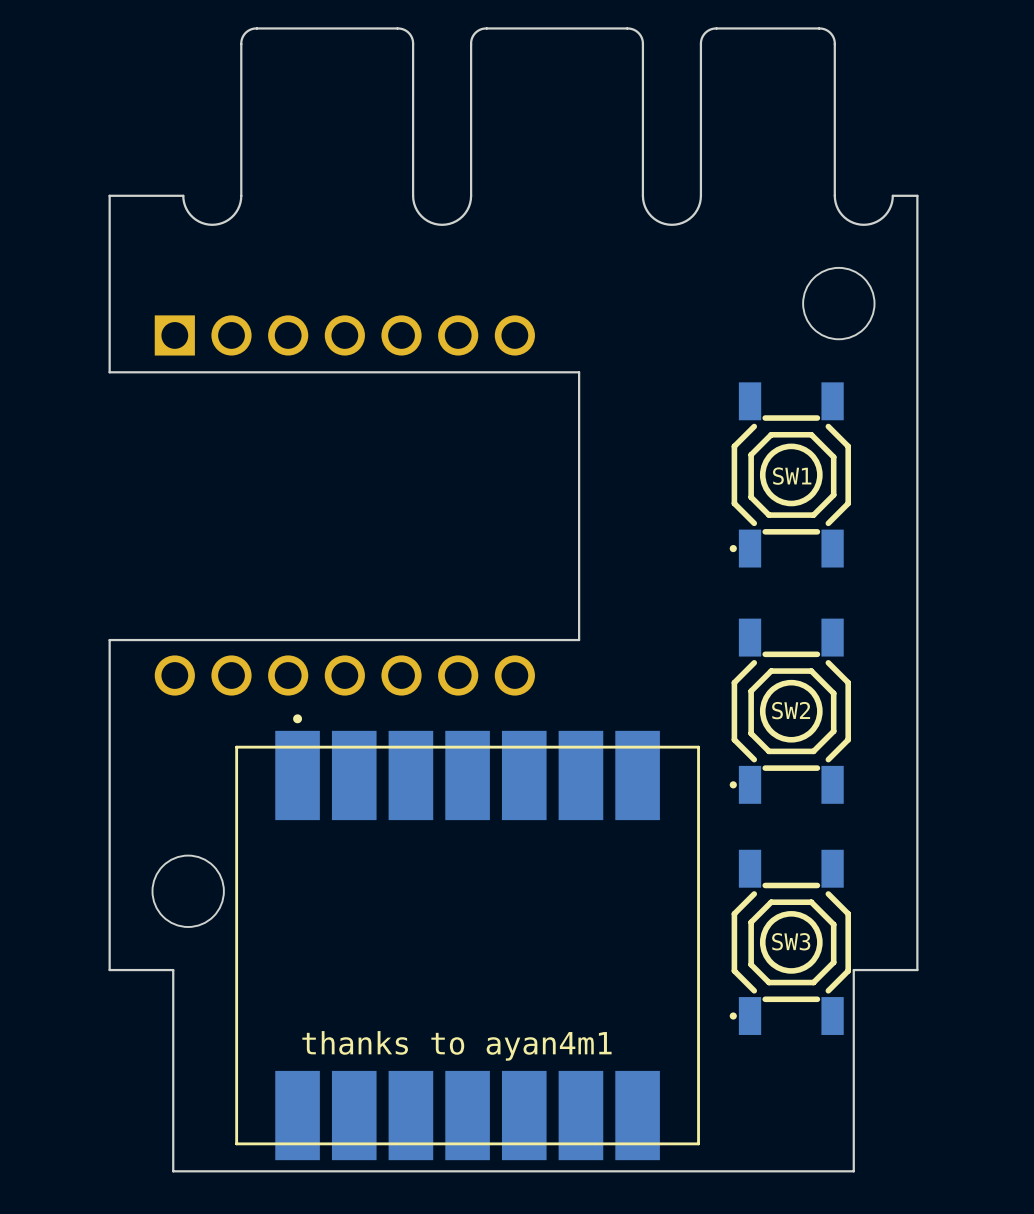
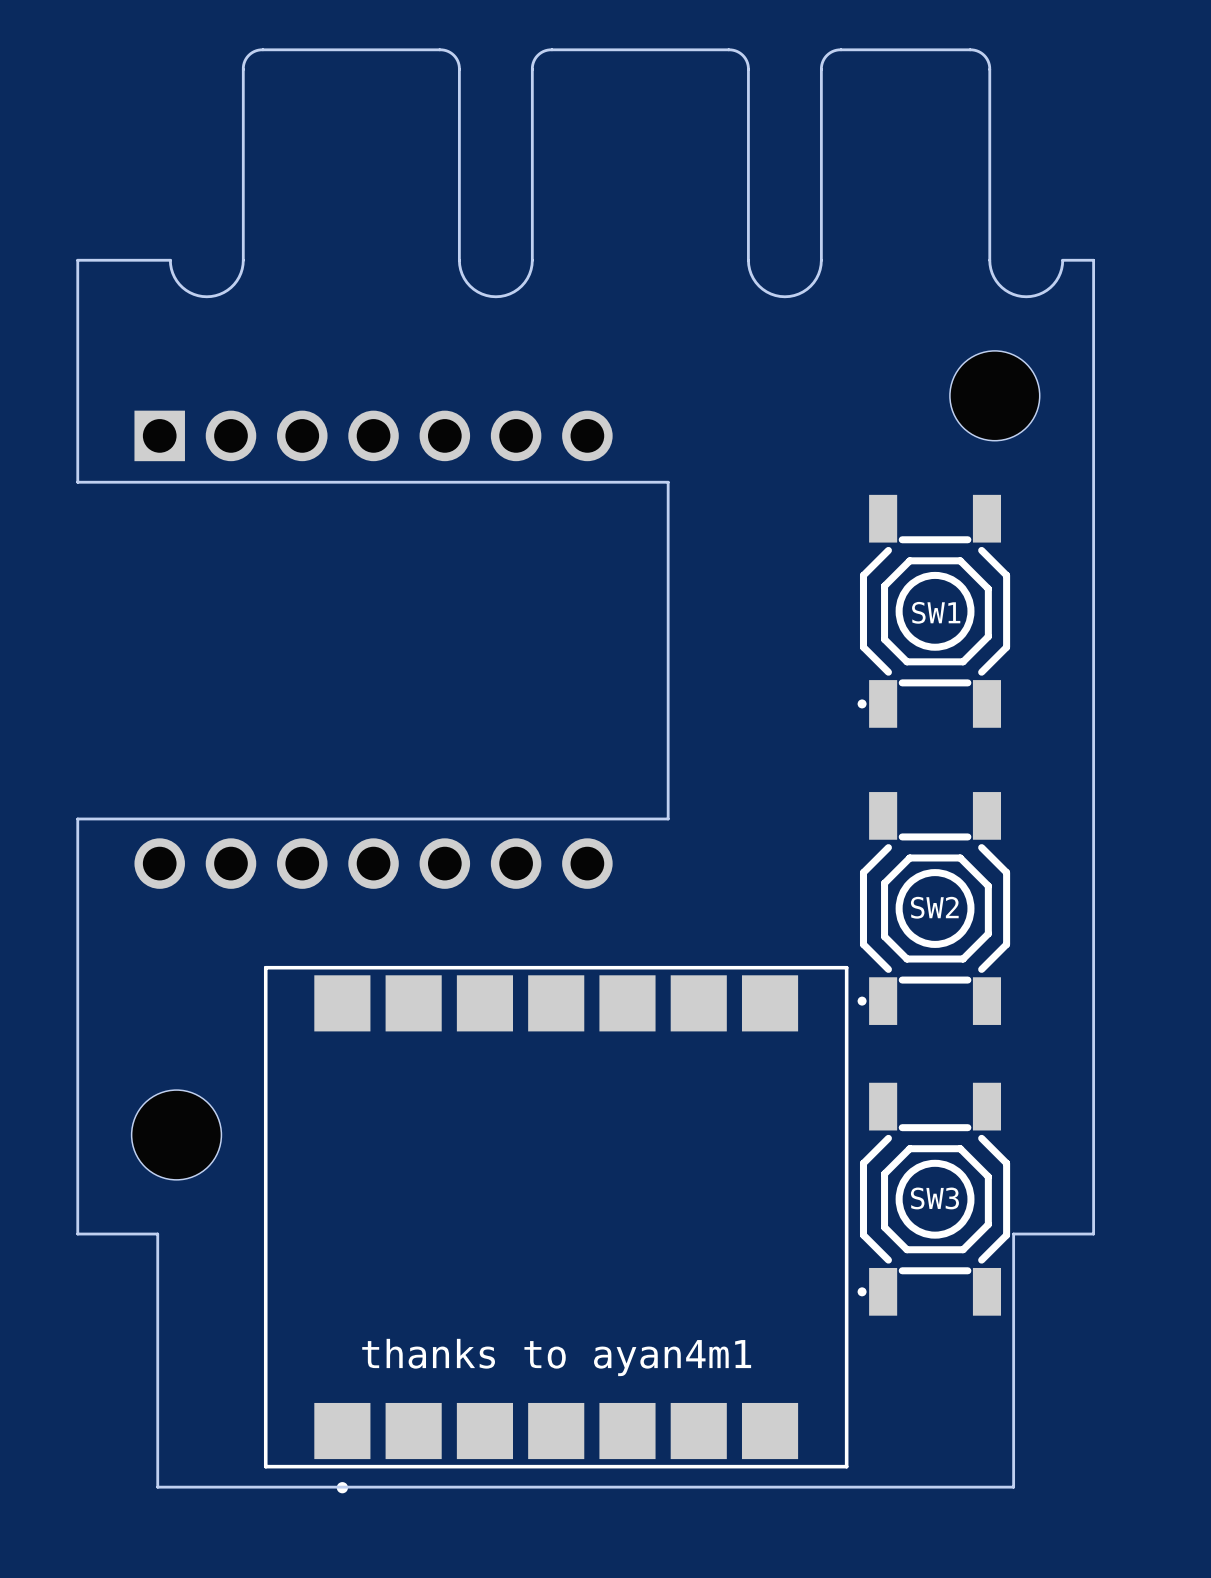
part: (467, 937) -> none
part: none -> (556, 1229)
text position: thanks to ayan4m1 (456, 1045) -> thanks to ayan4m1 (556, 1357)

